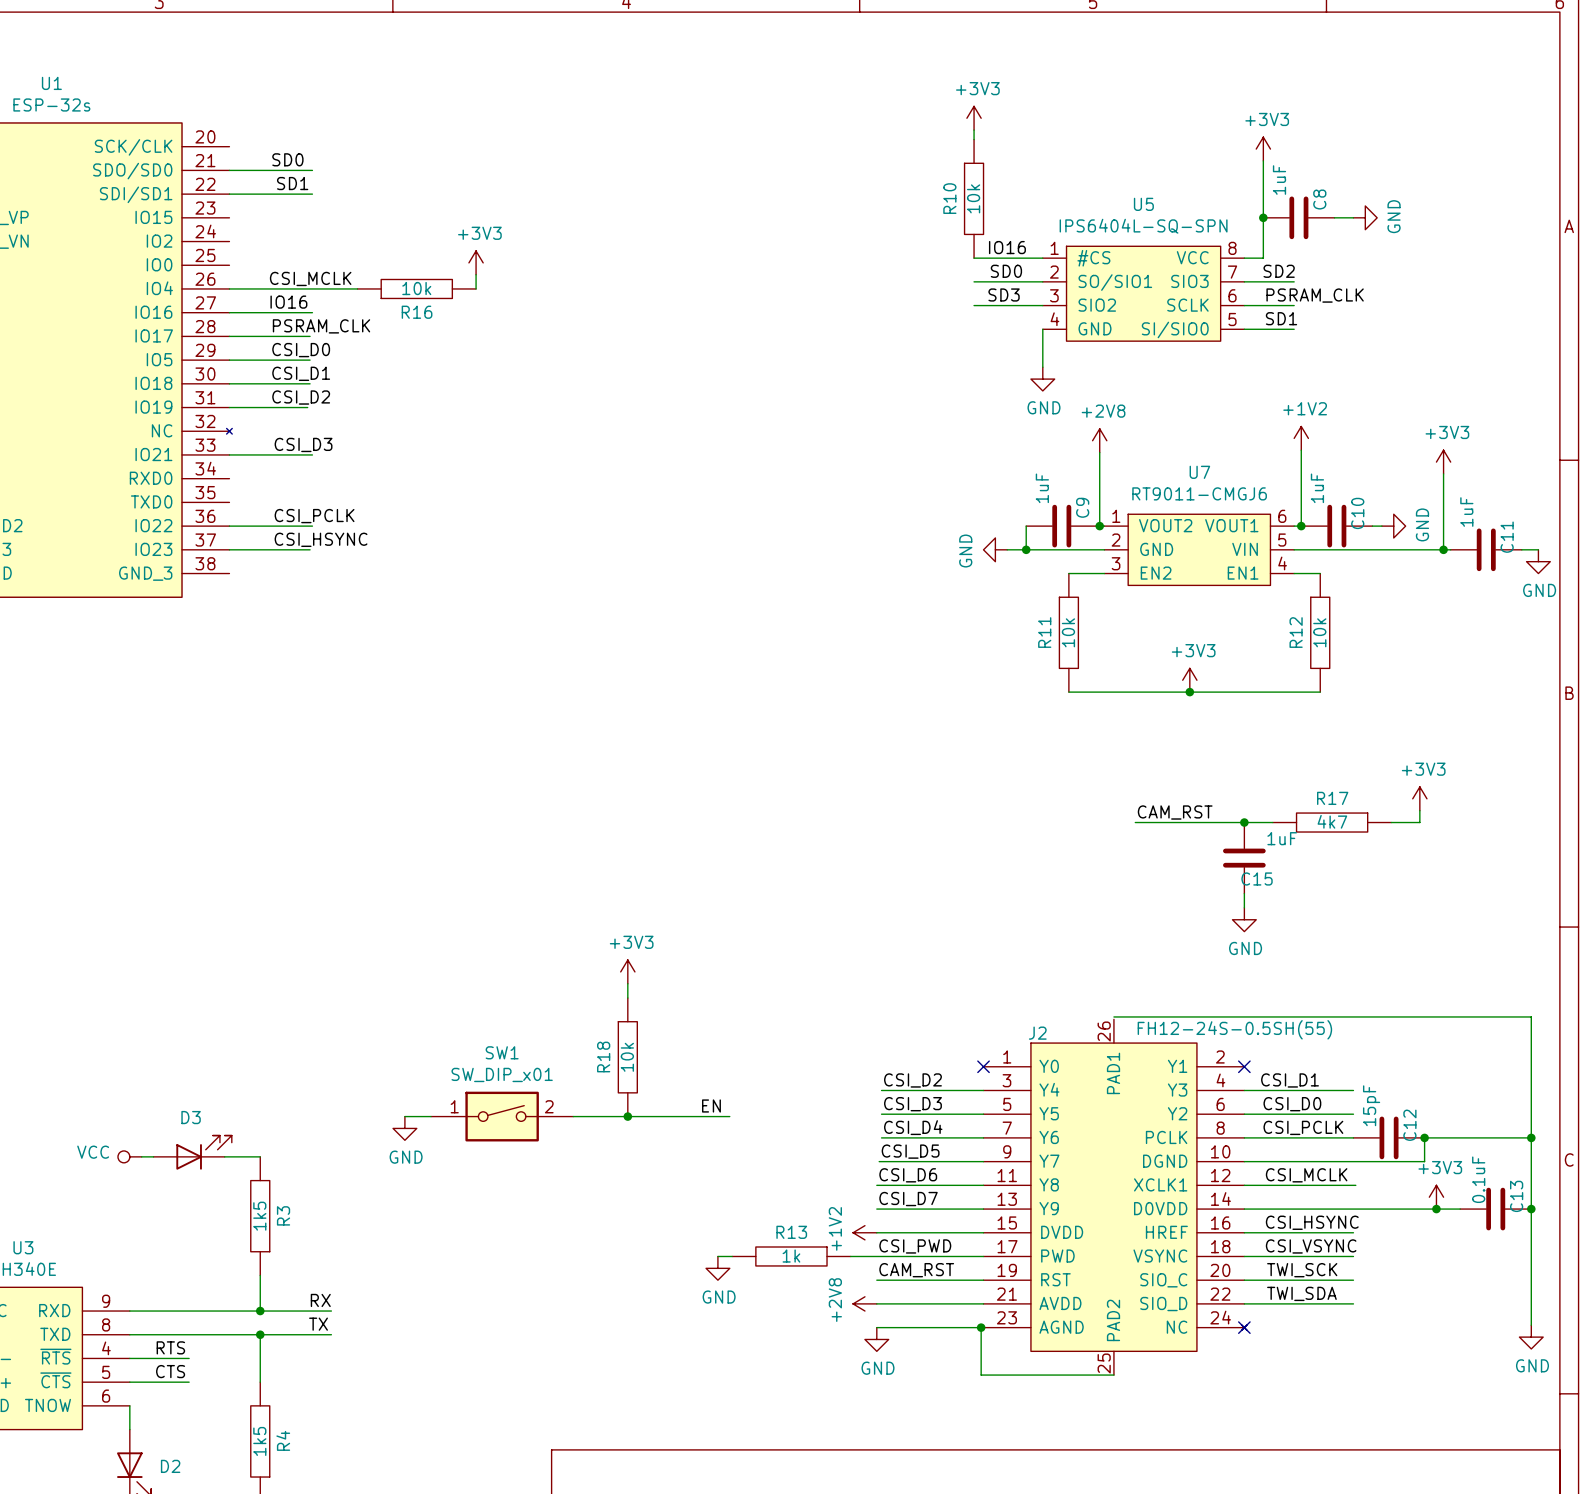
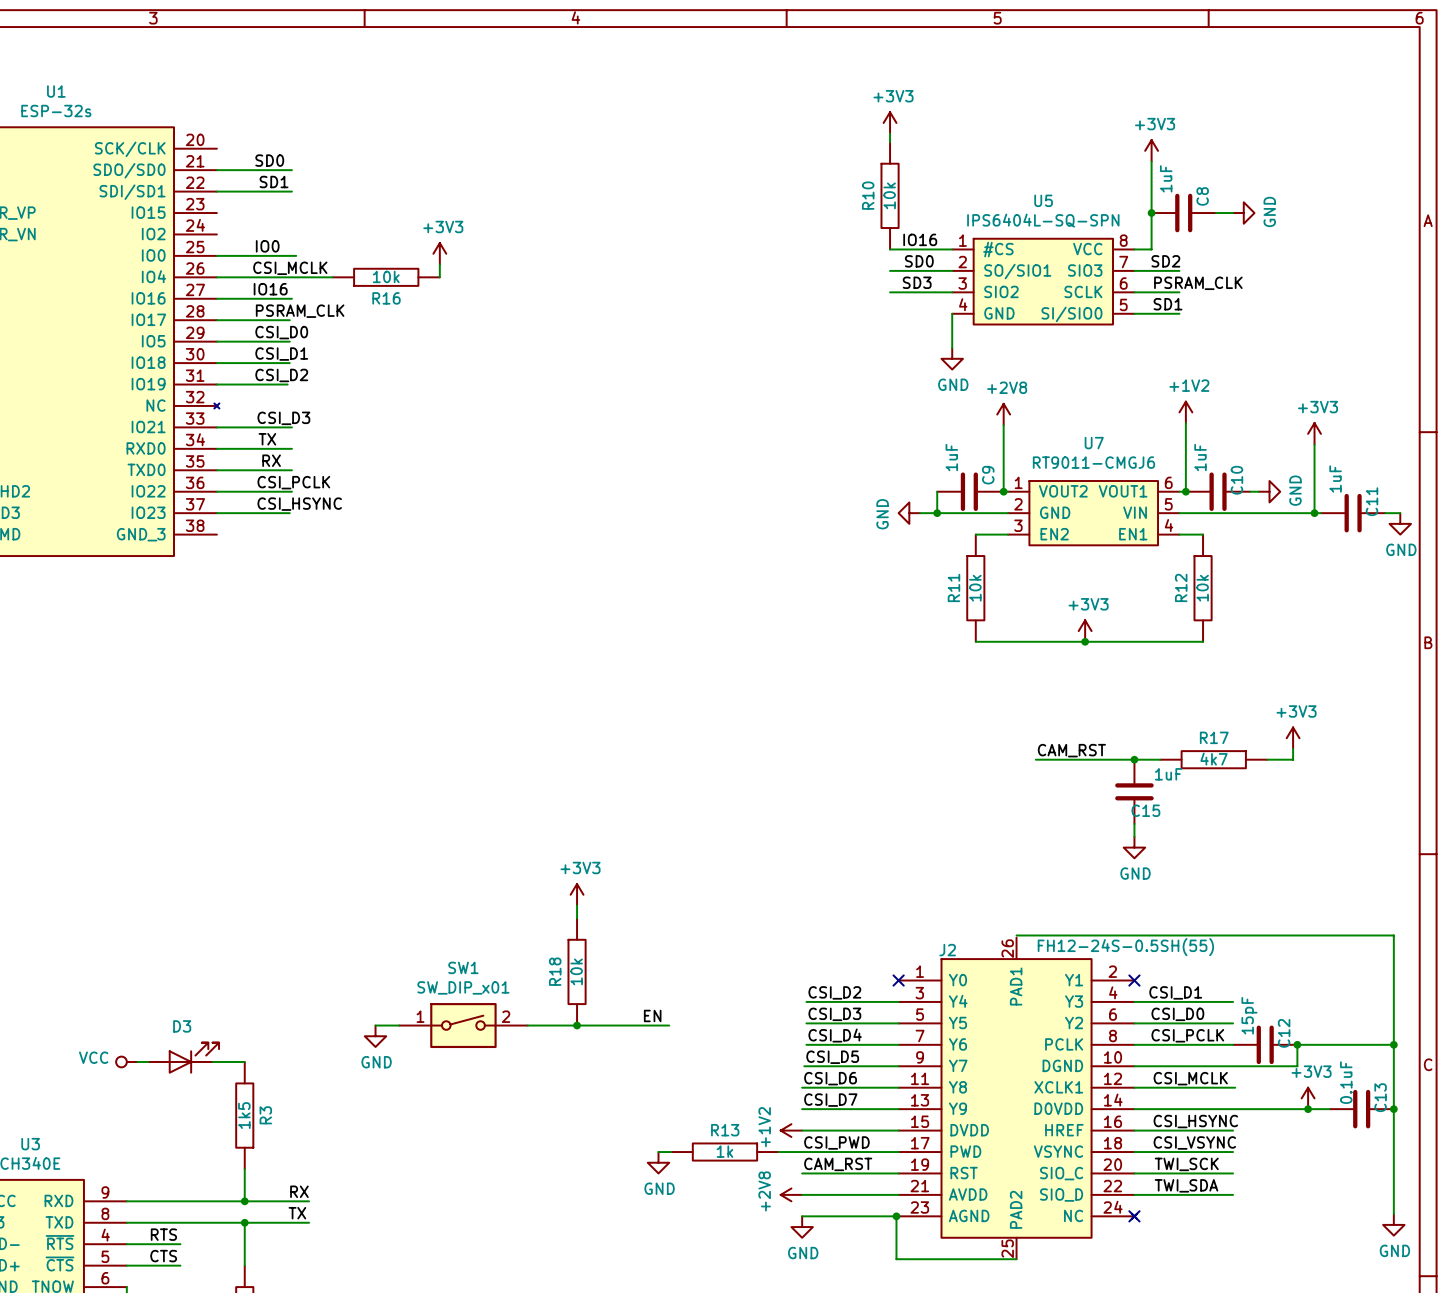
label: none -> IO0 (267, 246)
wire: none -> (216, 255) (296, 255)
label: none -> TX (267, 439)
wire: none -> (216, 448) (291, 448)
label: none -> RX (271, 460)
wire: none -> (216, 470) (291, 470)

